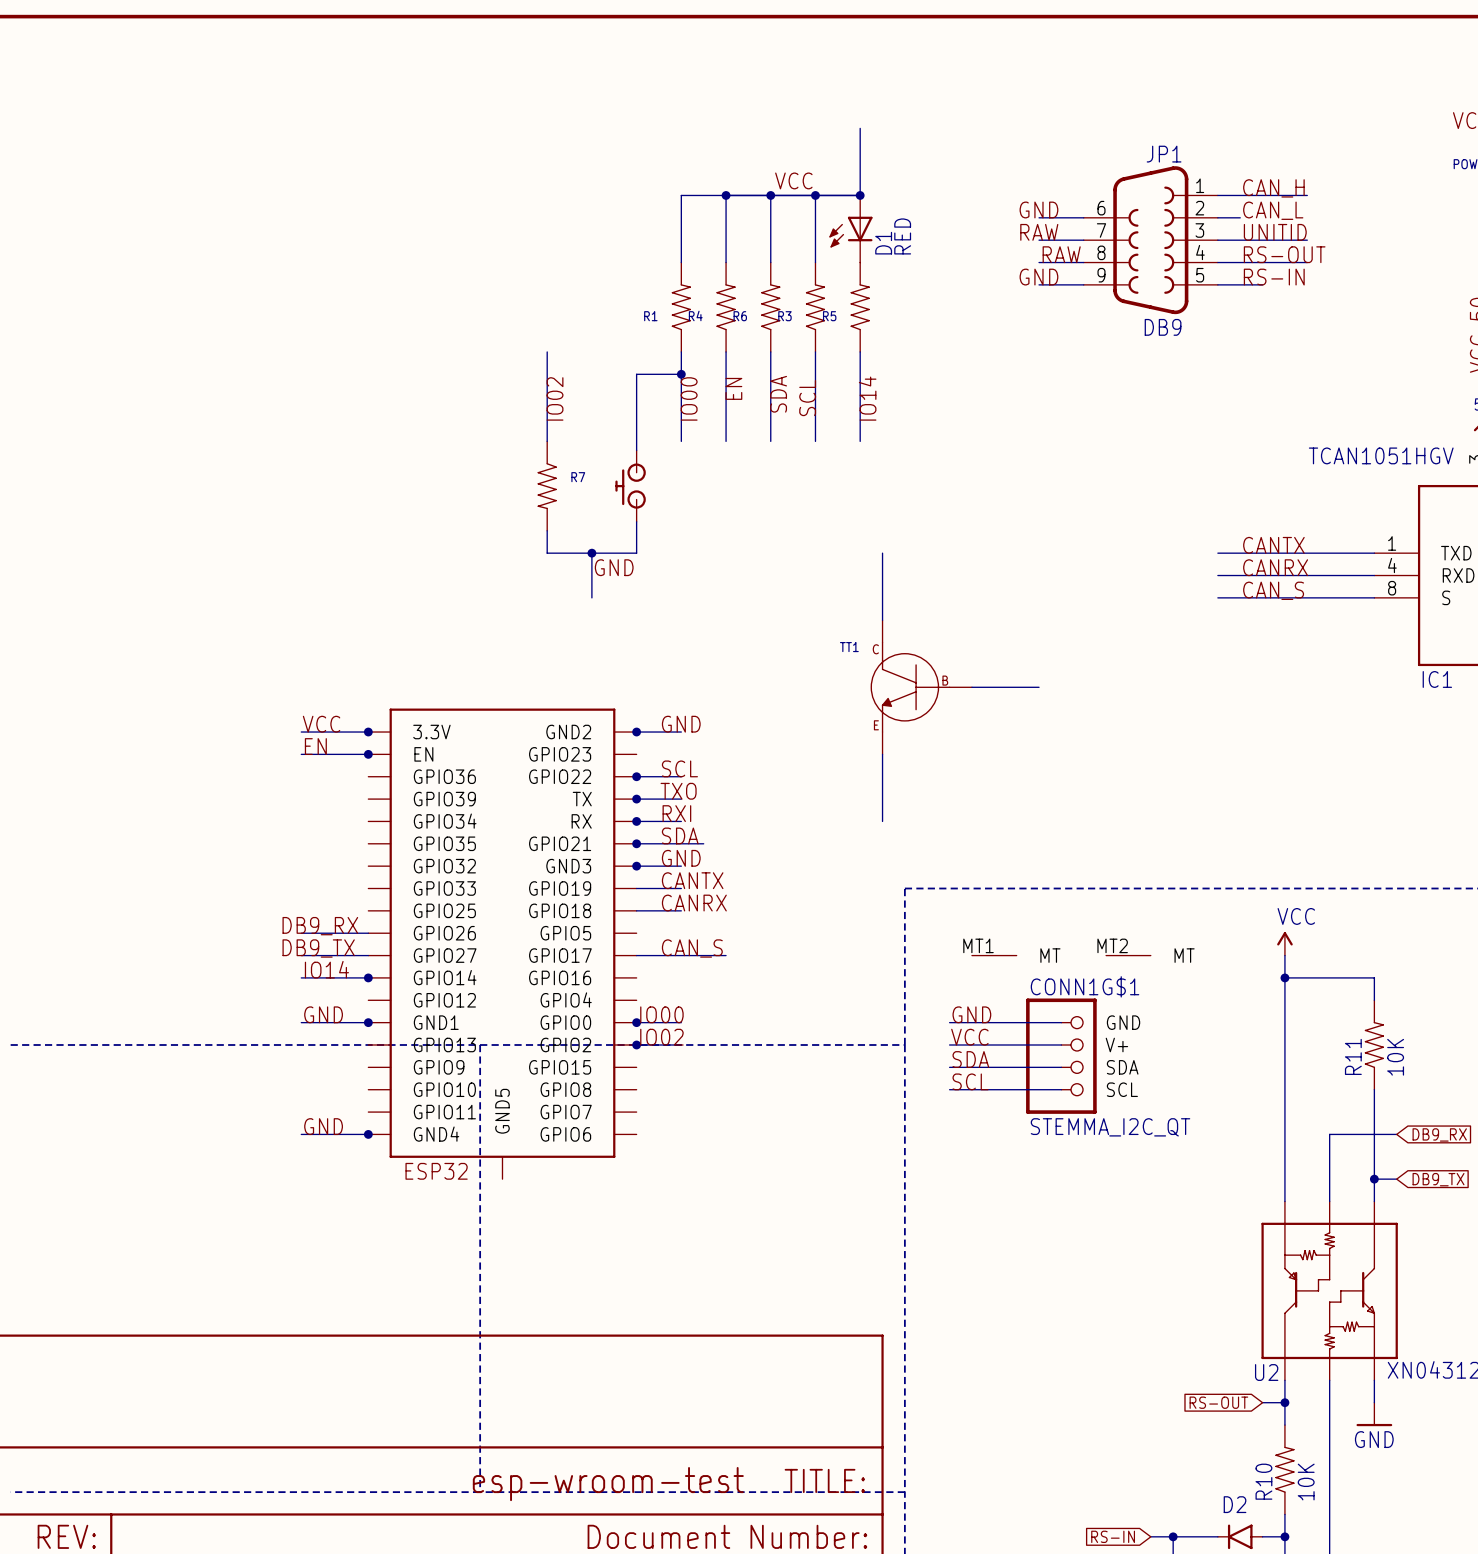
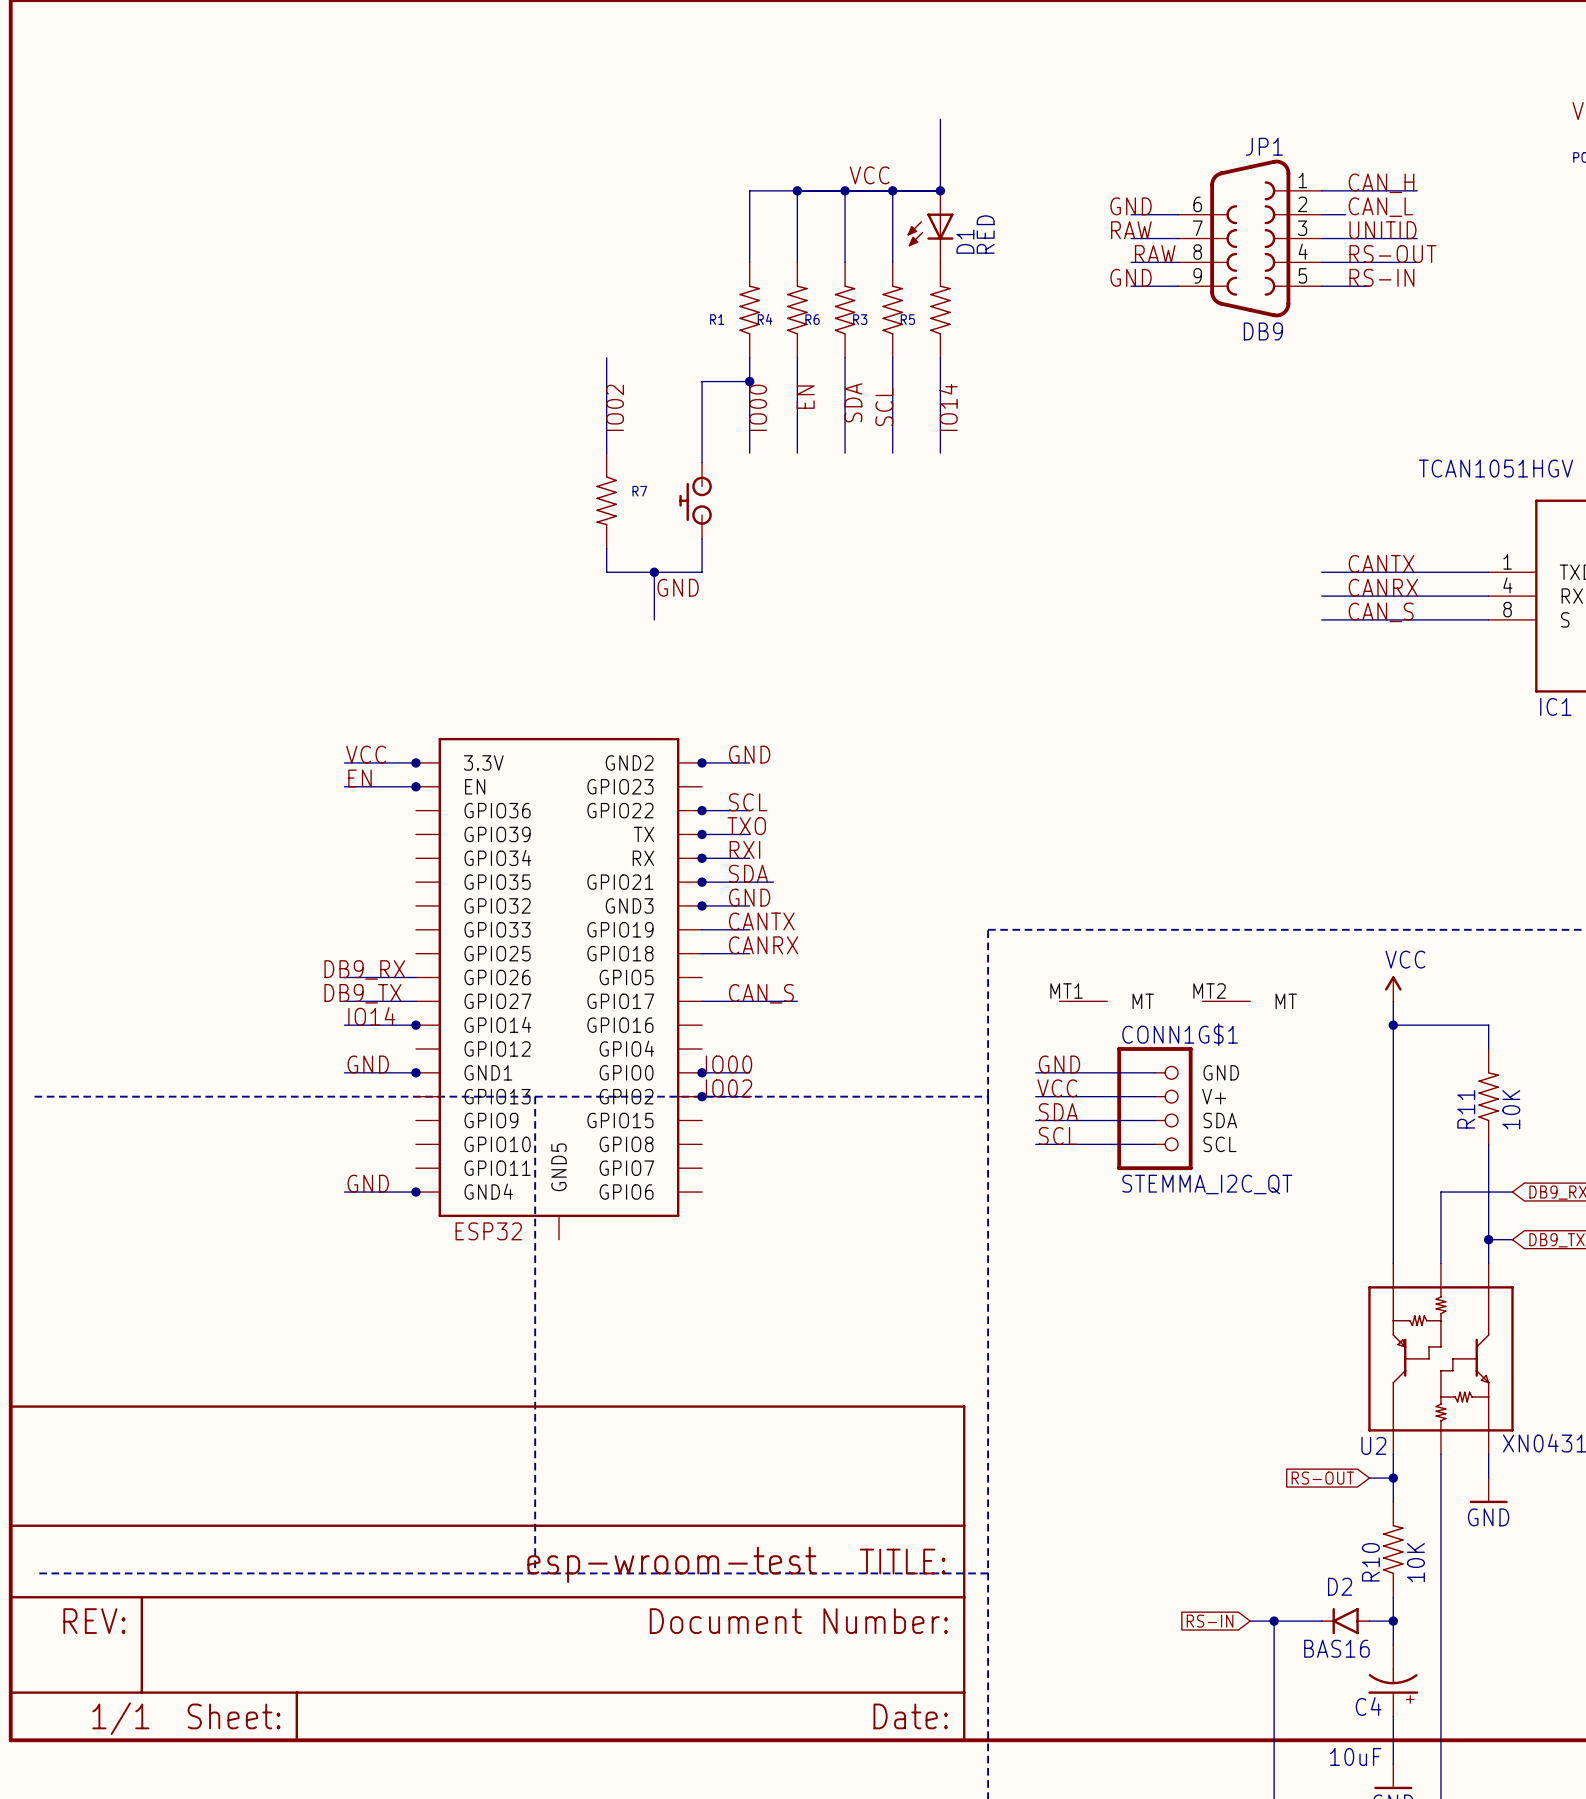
wire: (882, 553) (882, 620) -> none
TT1: (921, 687) -> none
wire: (971, 687) (1039, 687) -> none
wire: (882, 754) (882, 821) -> none

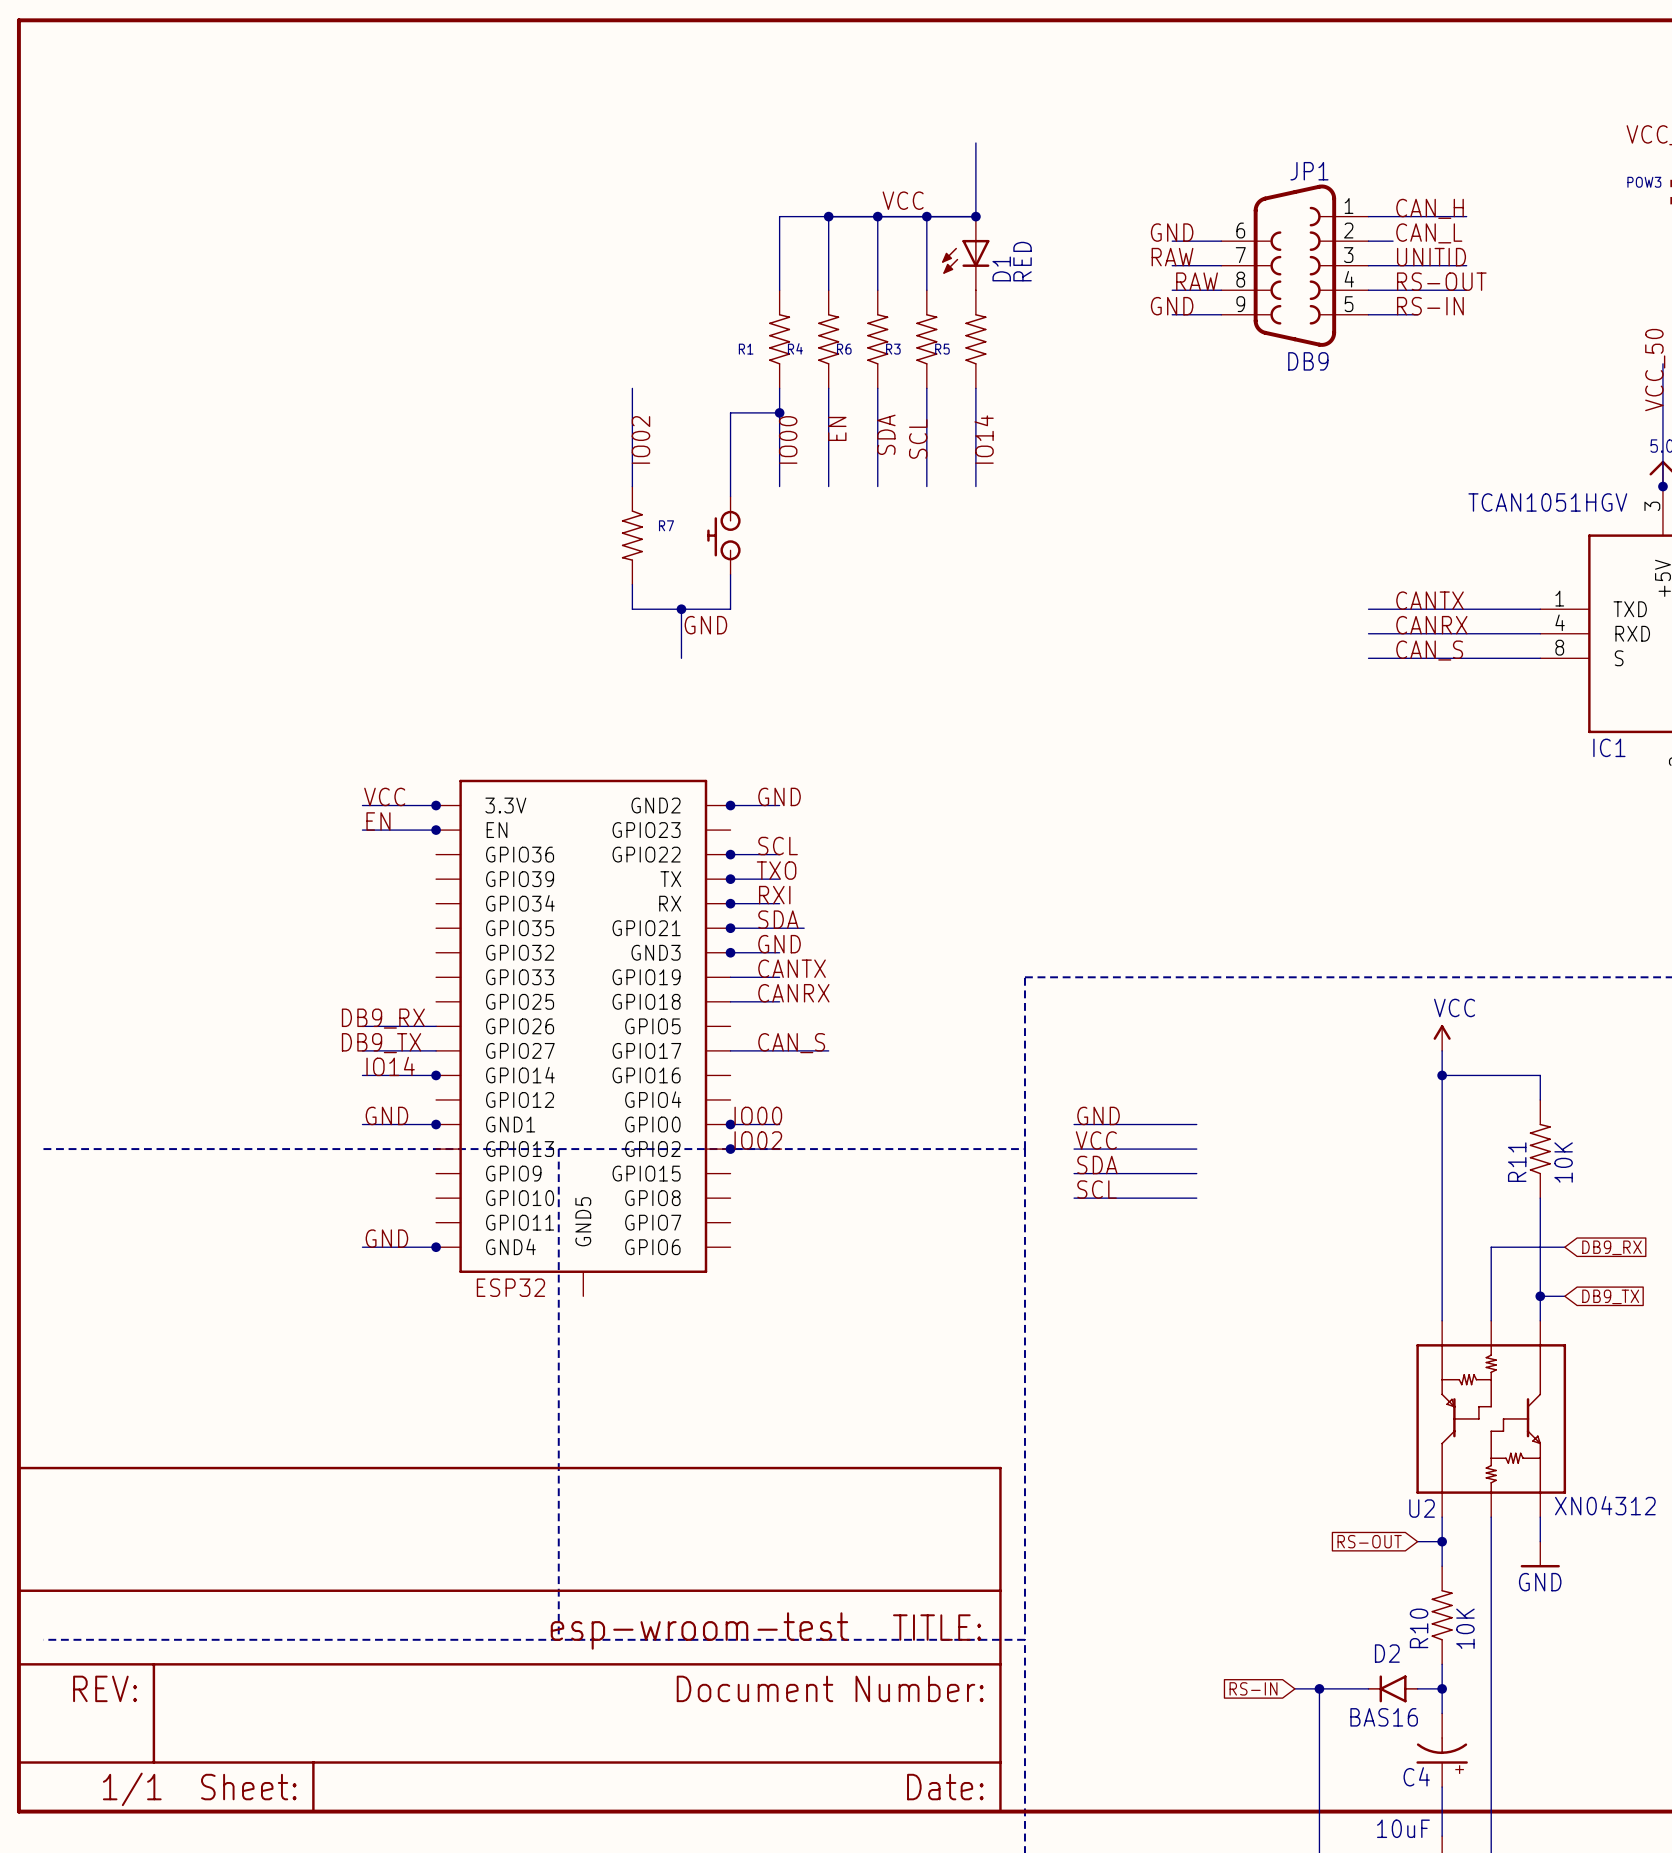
part: (1083, 1001) -> none
part: (1226, 1001) -> none
CONN1G$1: STEMMA_I2C_QT (1154, 1108) -> none

